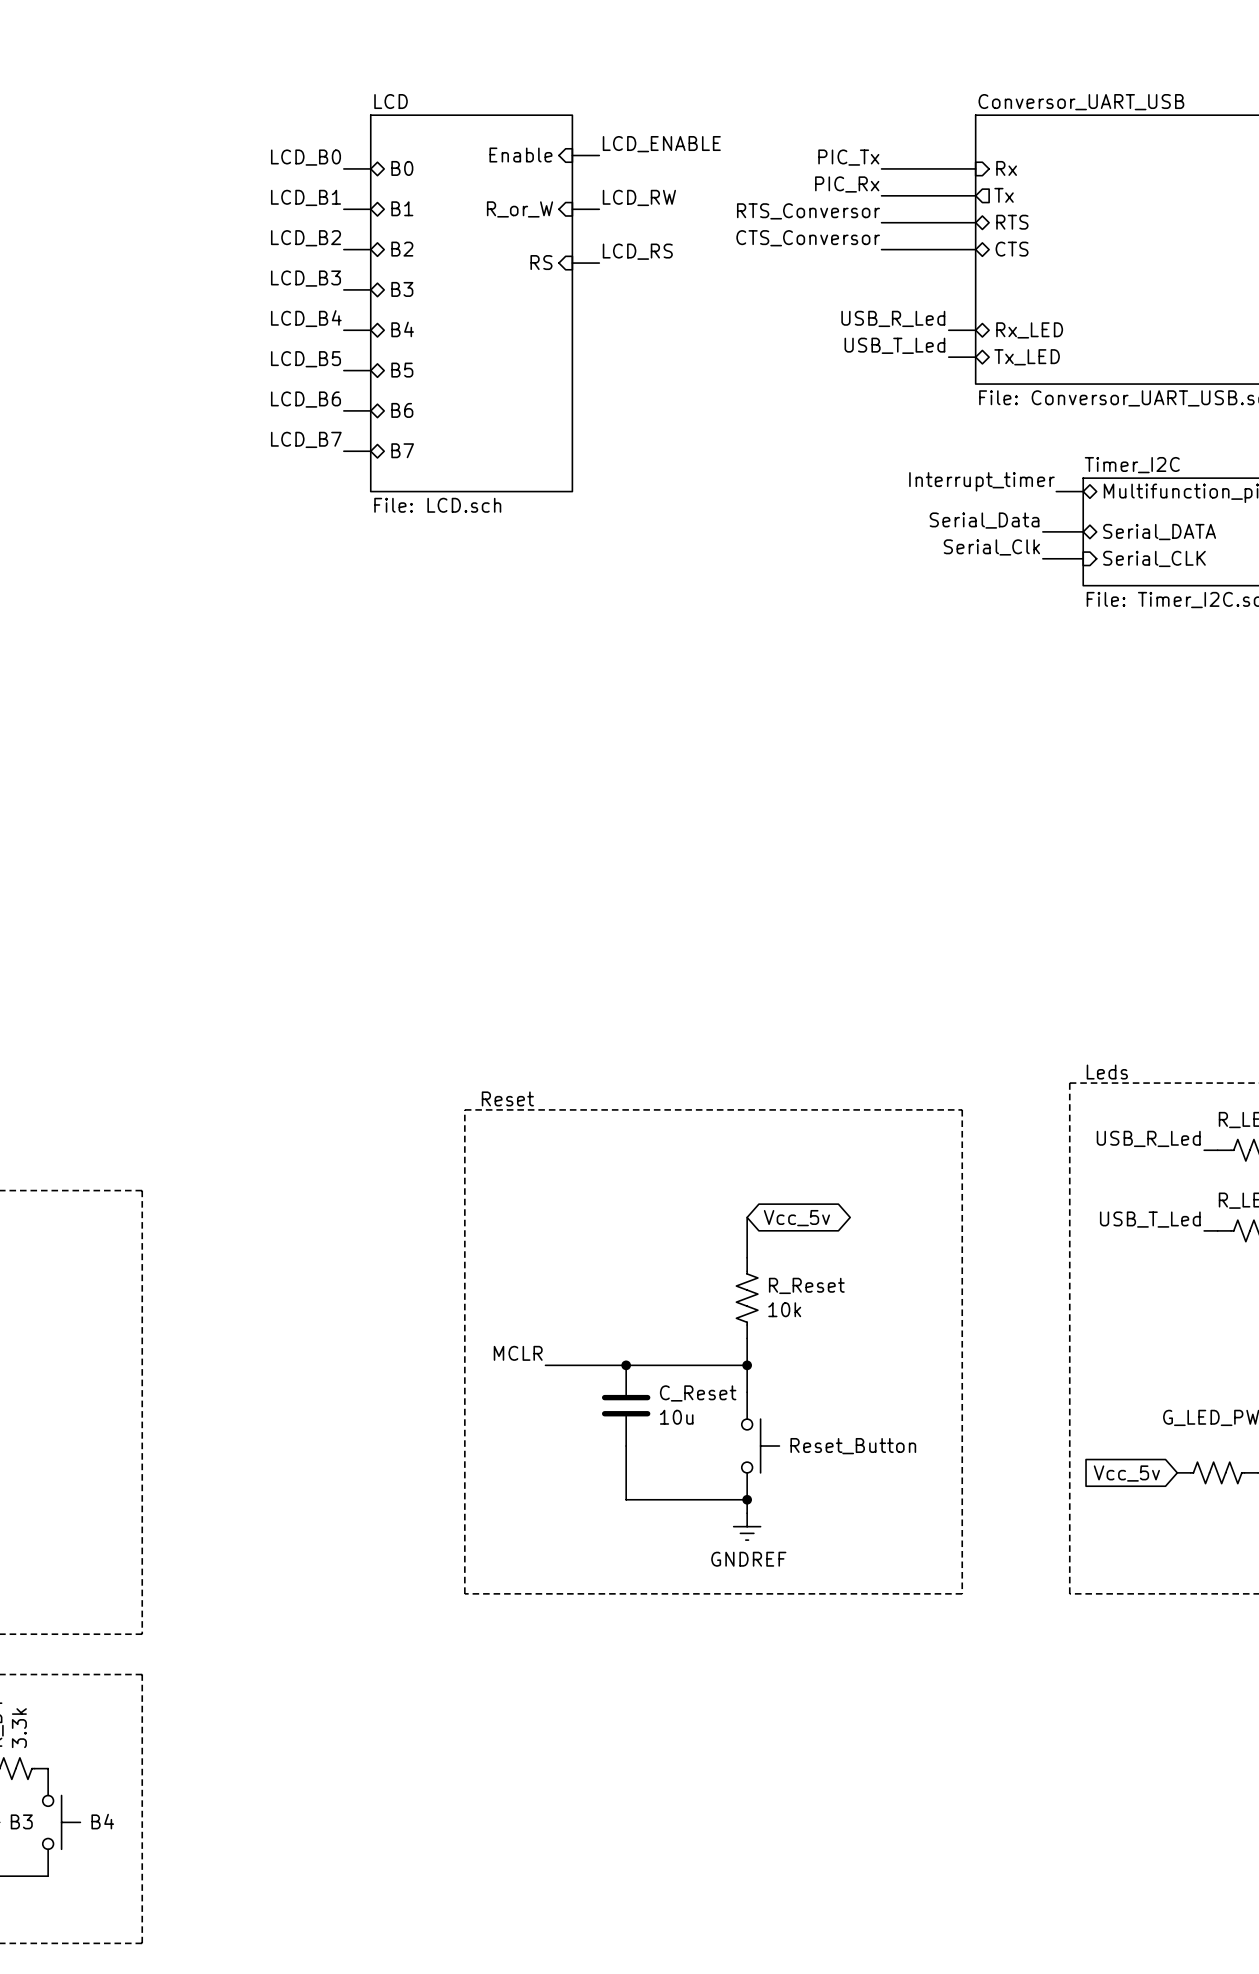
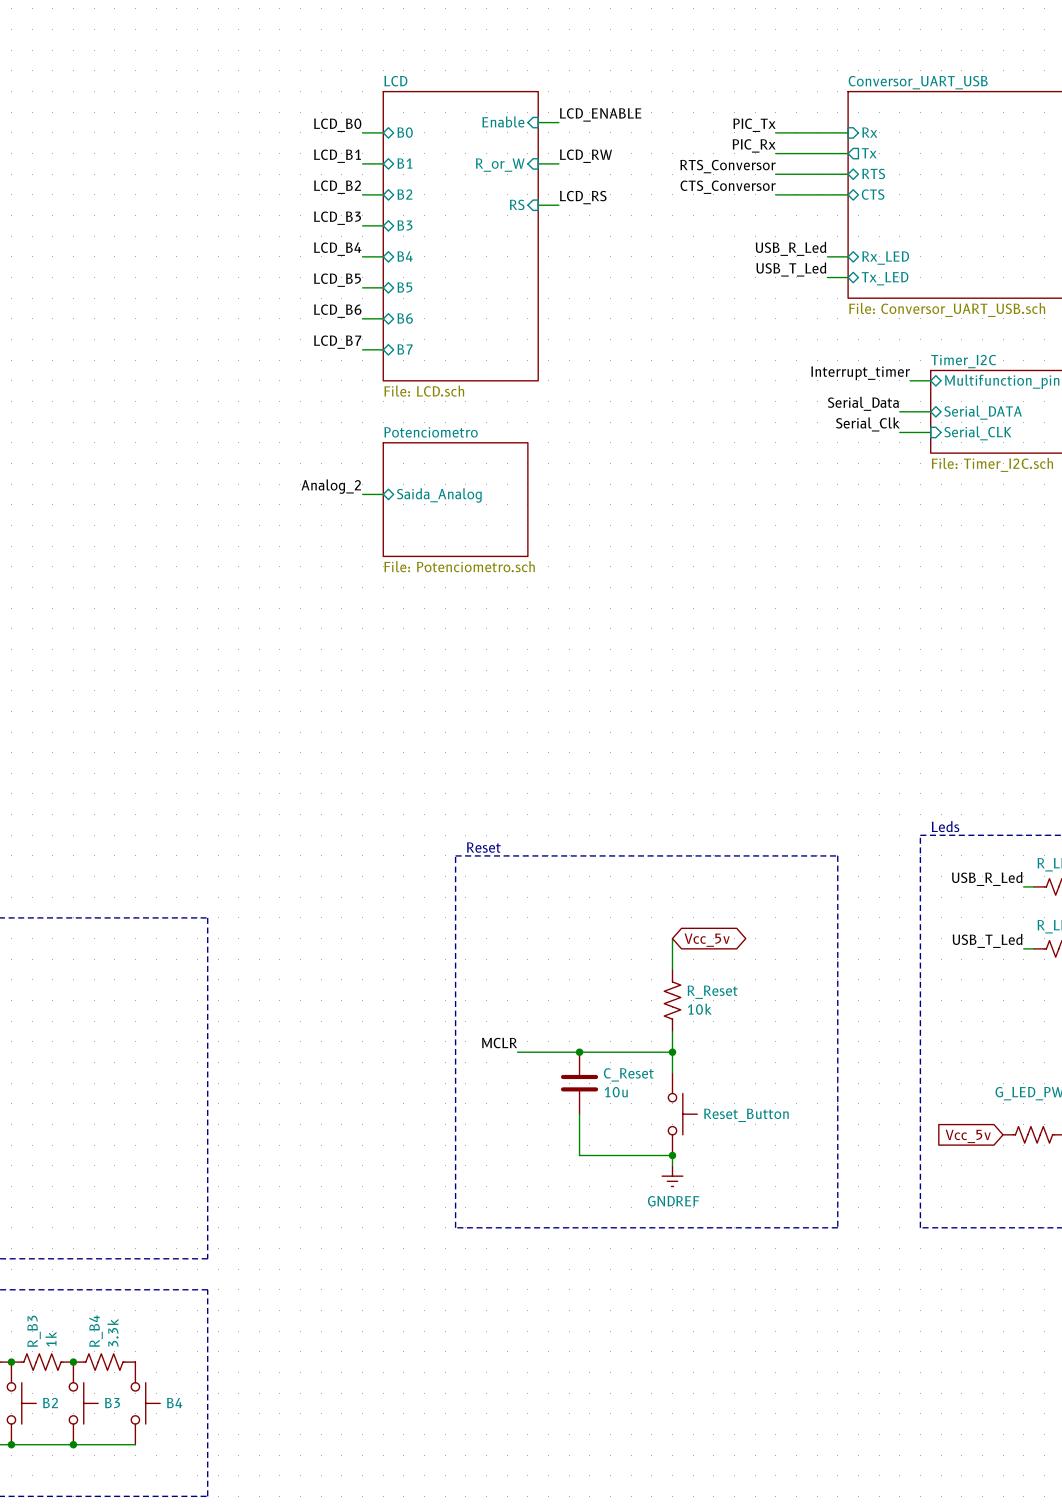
label: none -> Analog_2 (331, 486)
wire: none -> (362, 494) (383, 494)
sheet pin: none -> Saida_Analog (439, 495)
sheet Potenciometro: none -> File: Potenciometro.sch (455, 499)

